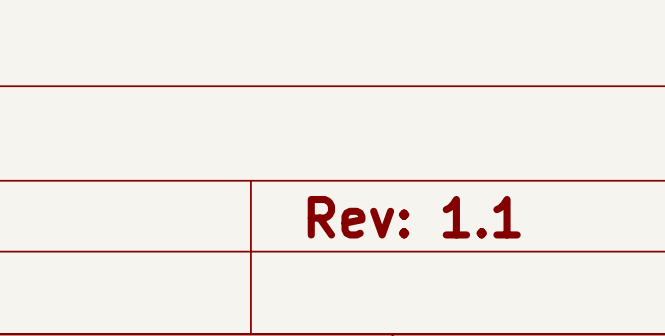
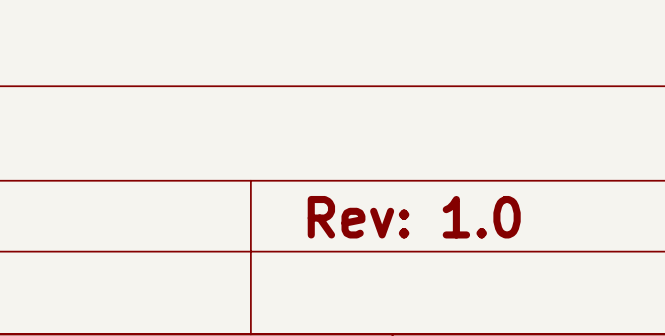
title block: Rev: 1.1 (414, 217) -> Rev: 1.0 (414, 217)

